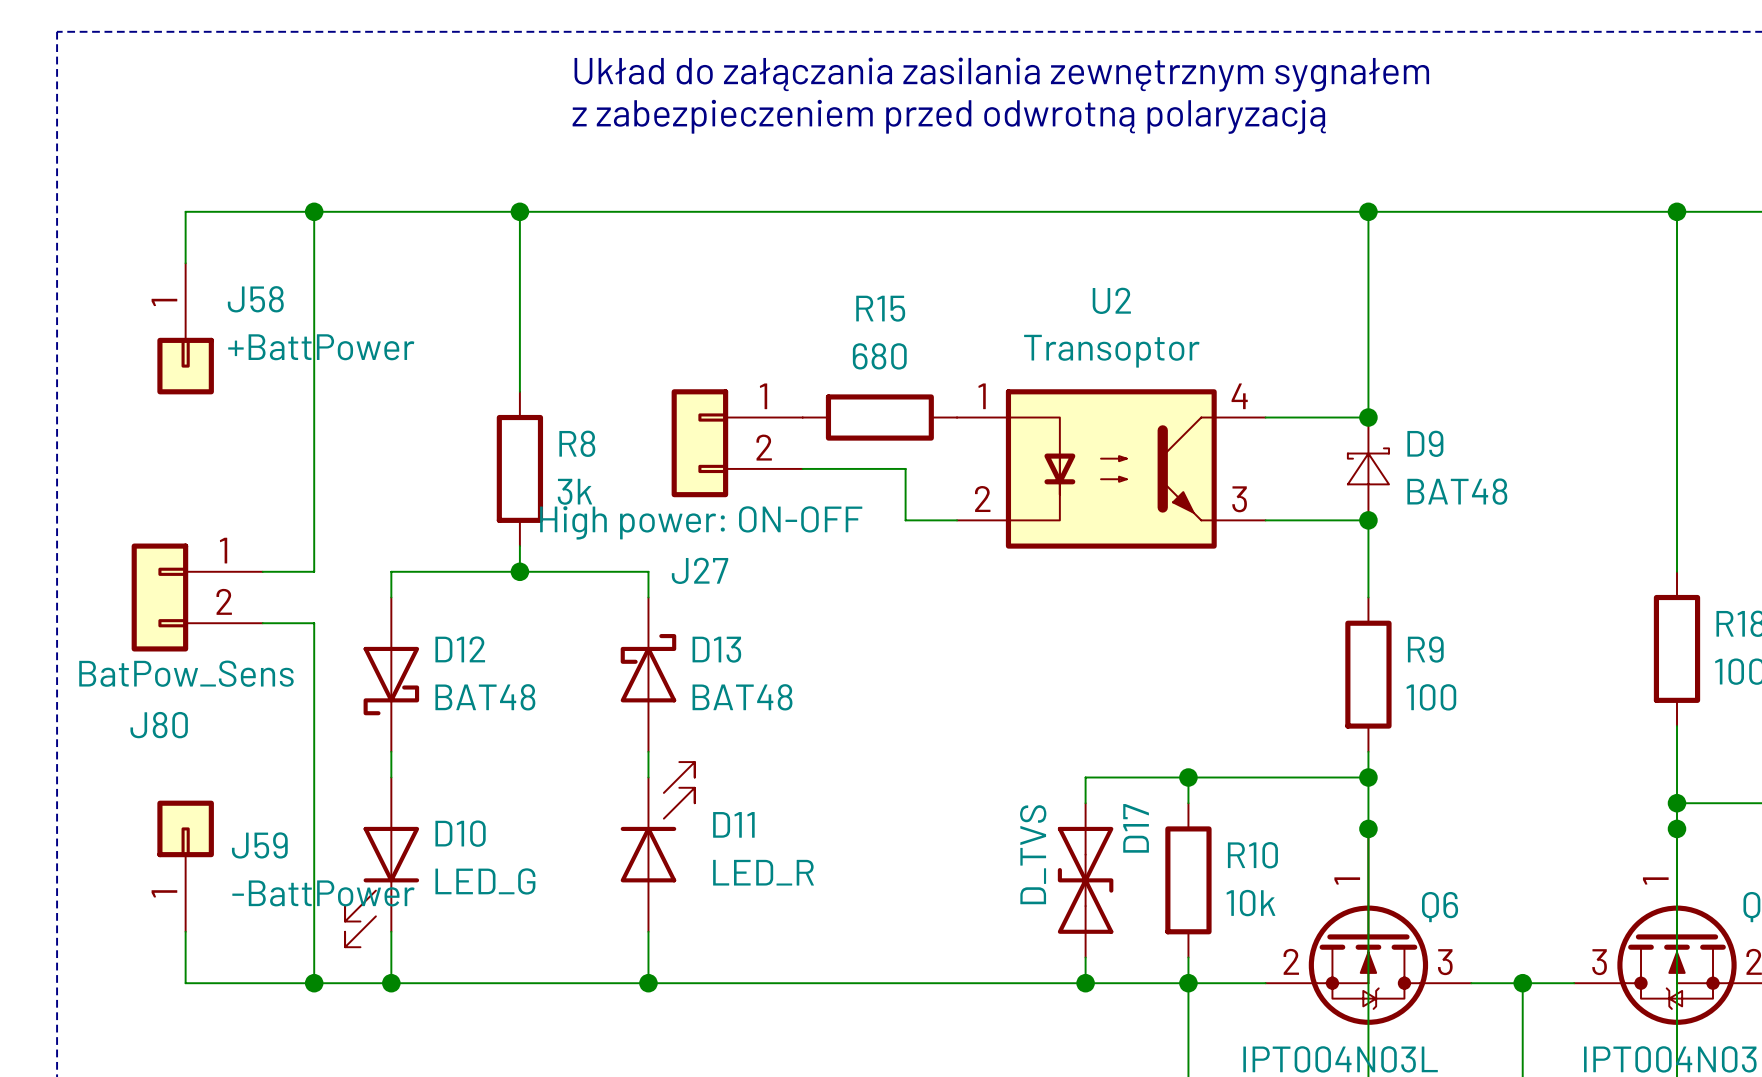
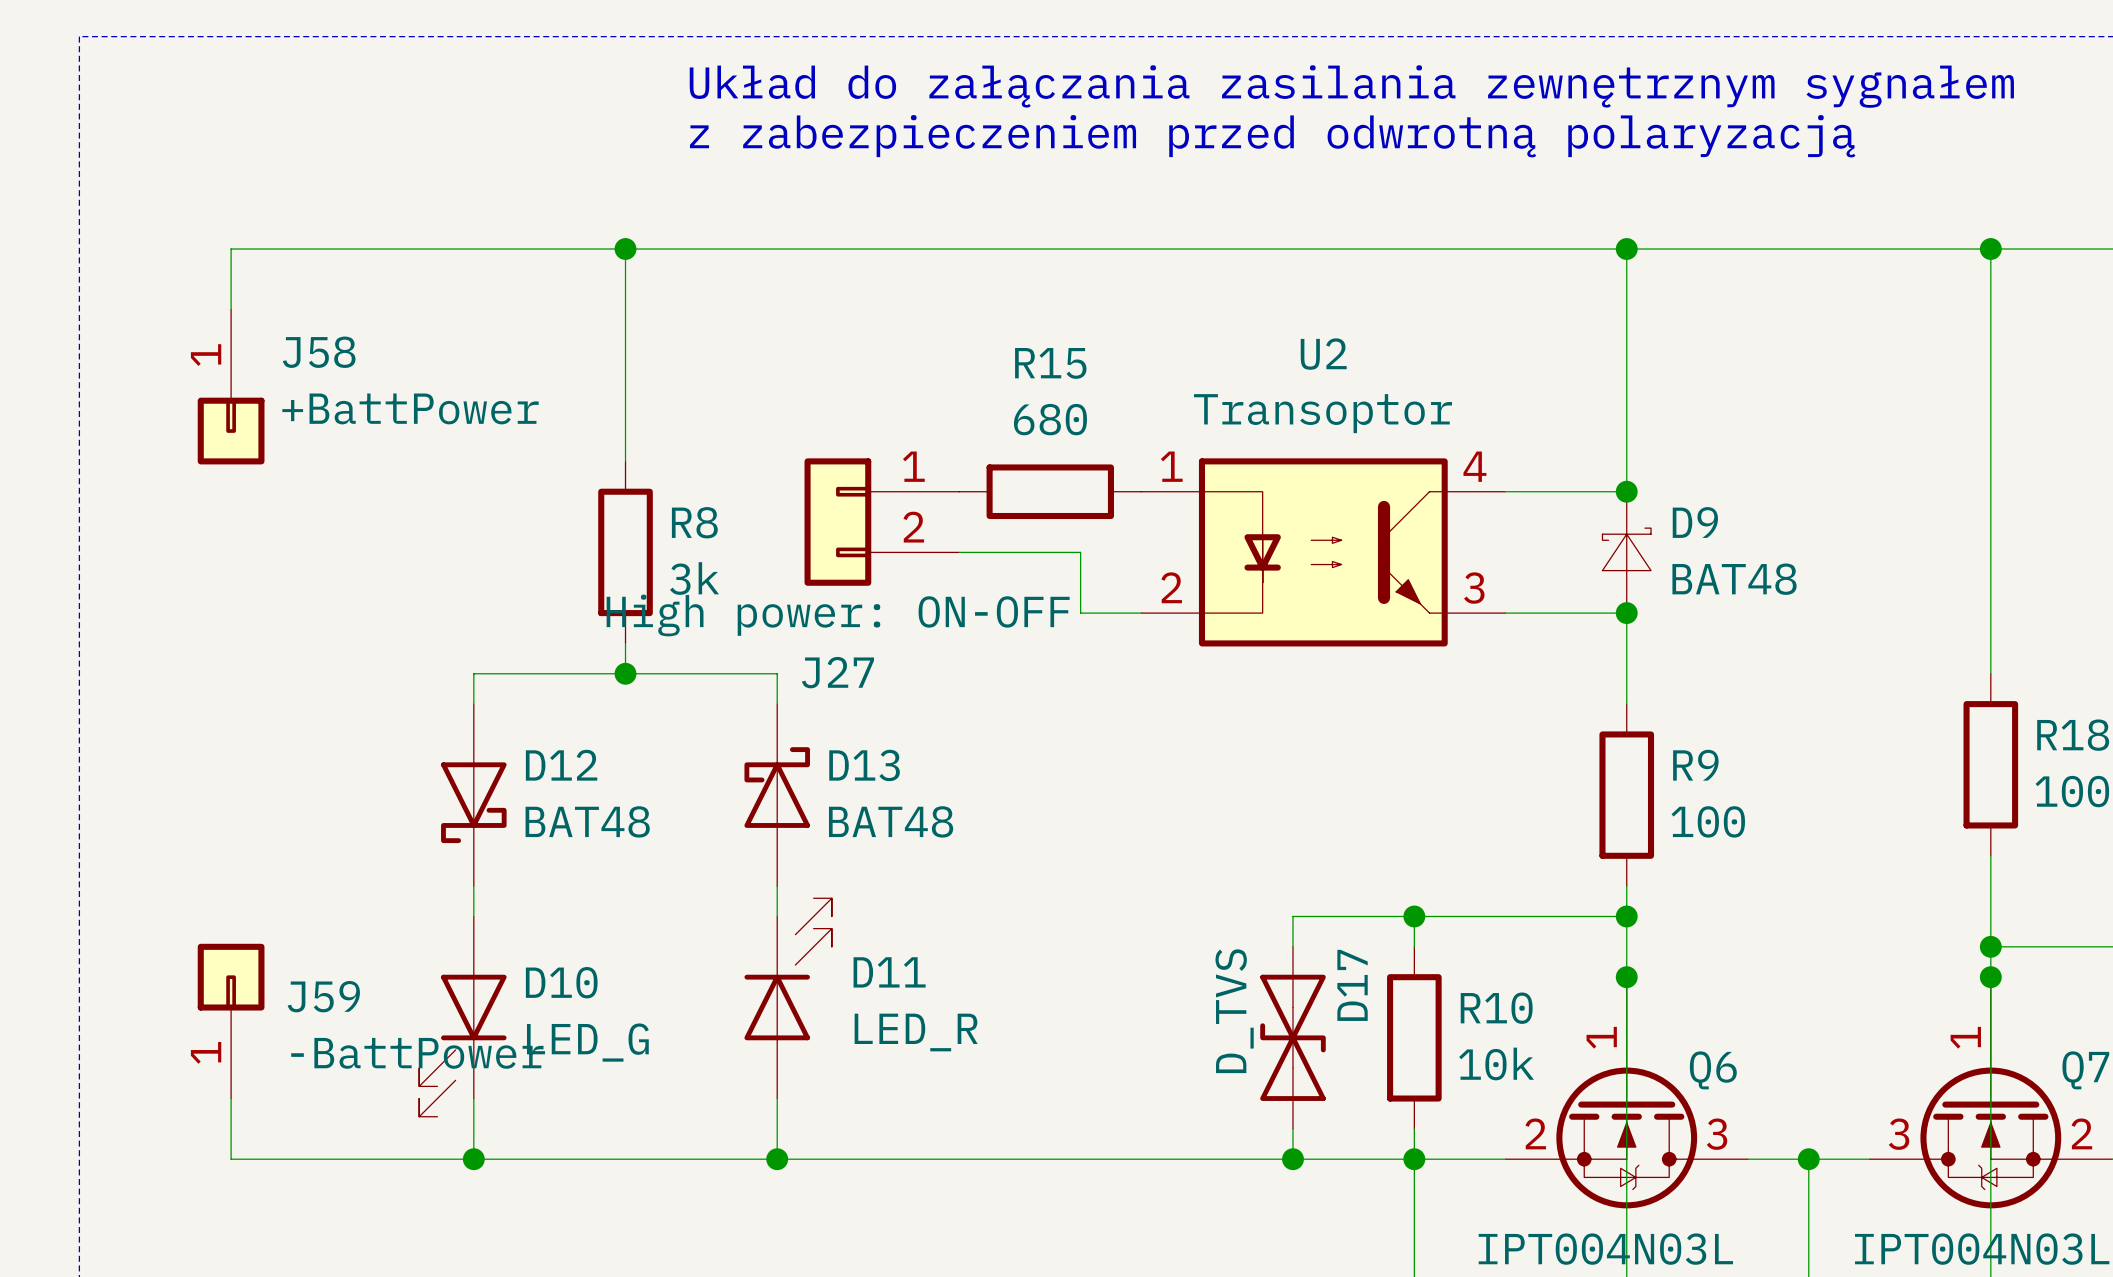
wire: (314, 211) (314, 571) (262, 571) -> none
junction: (314, 211) -> none
J80: BatPow_Sens (197, 597) -> none
wire: (262, 623) (314, 623) (314, 983) -> none
junction: (314, 983) -> none

